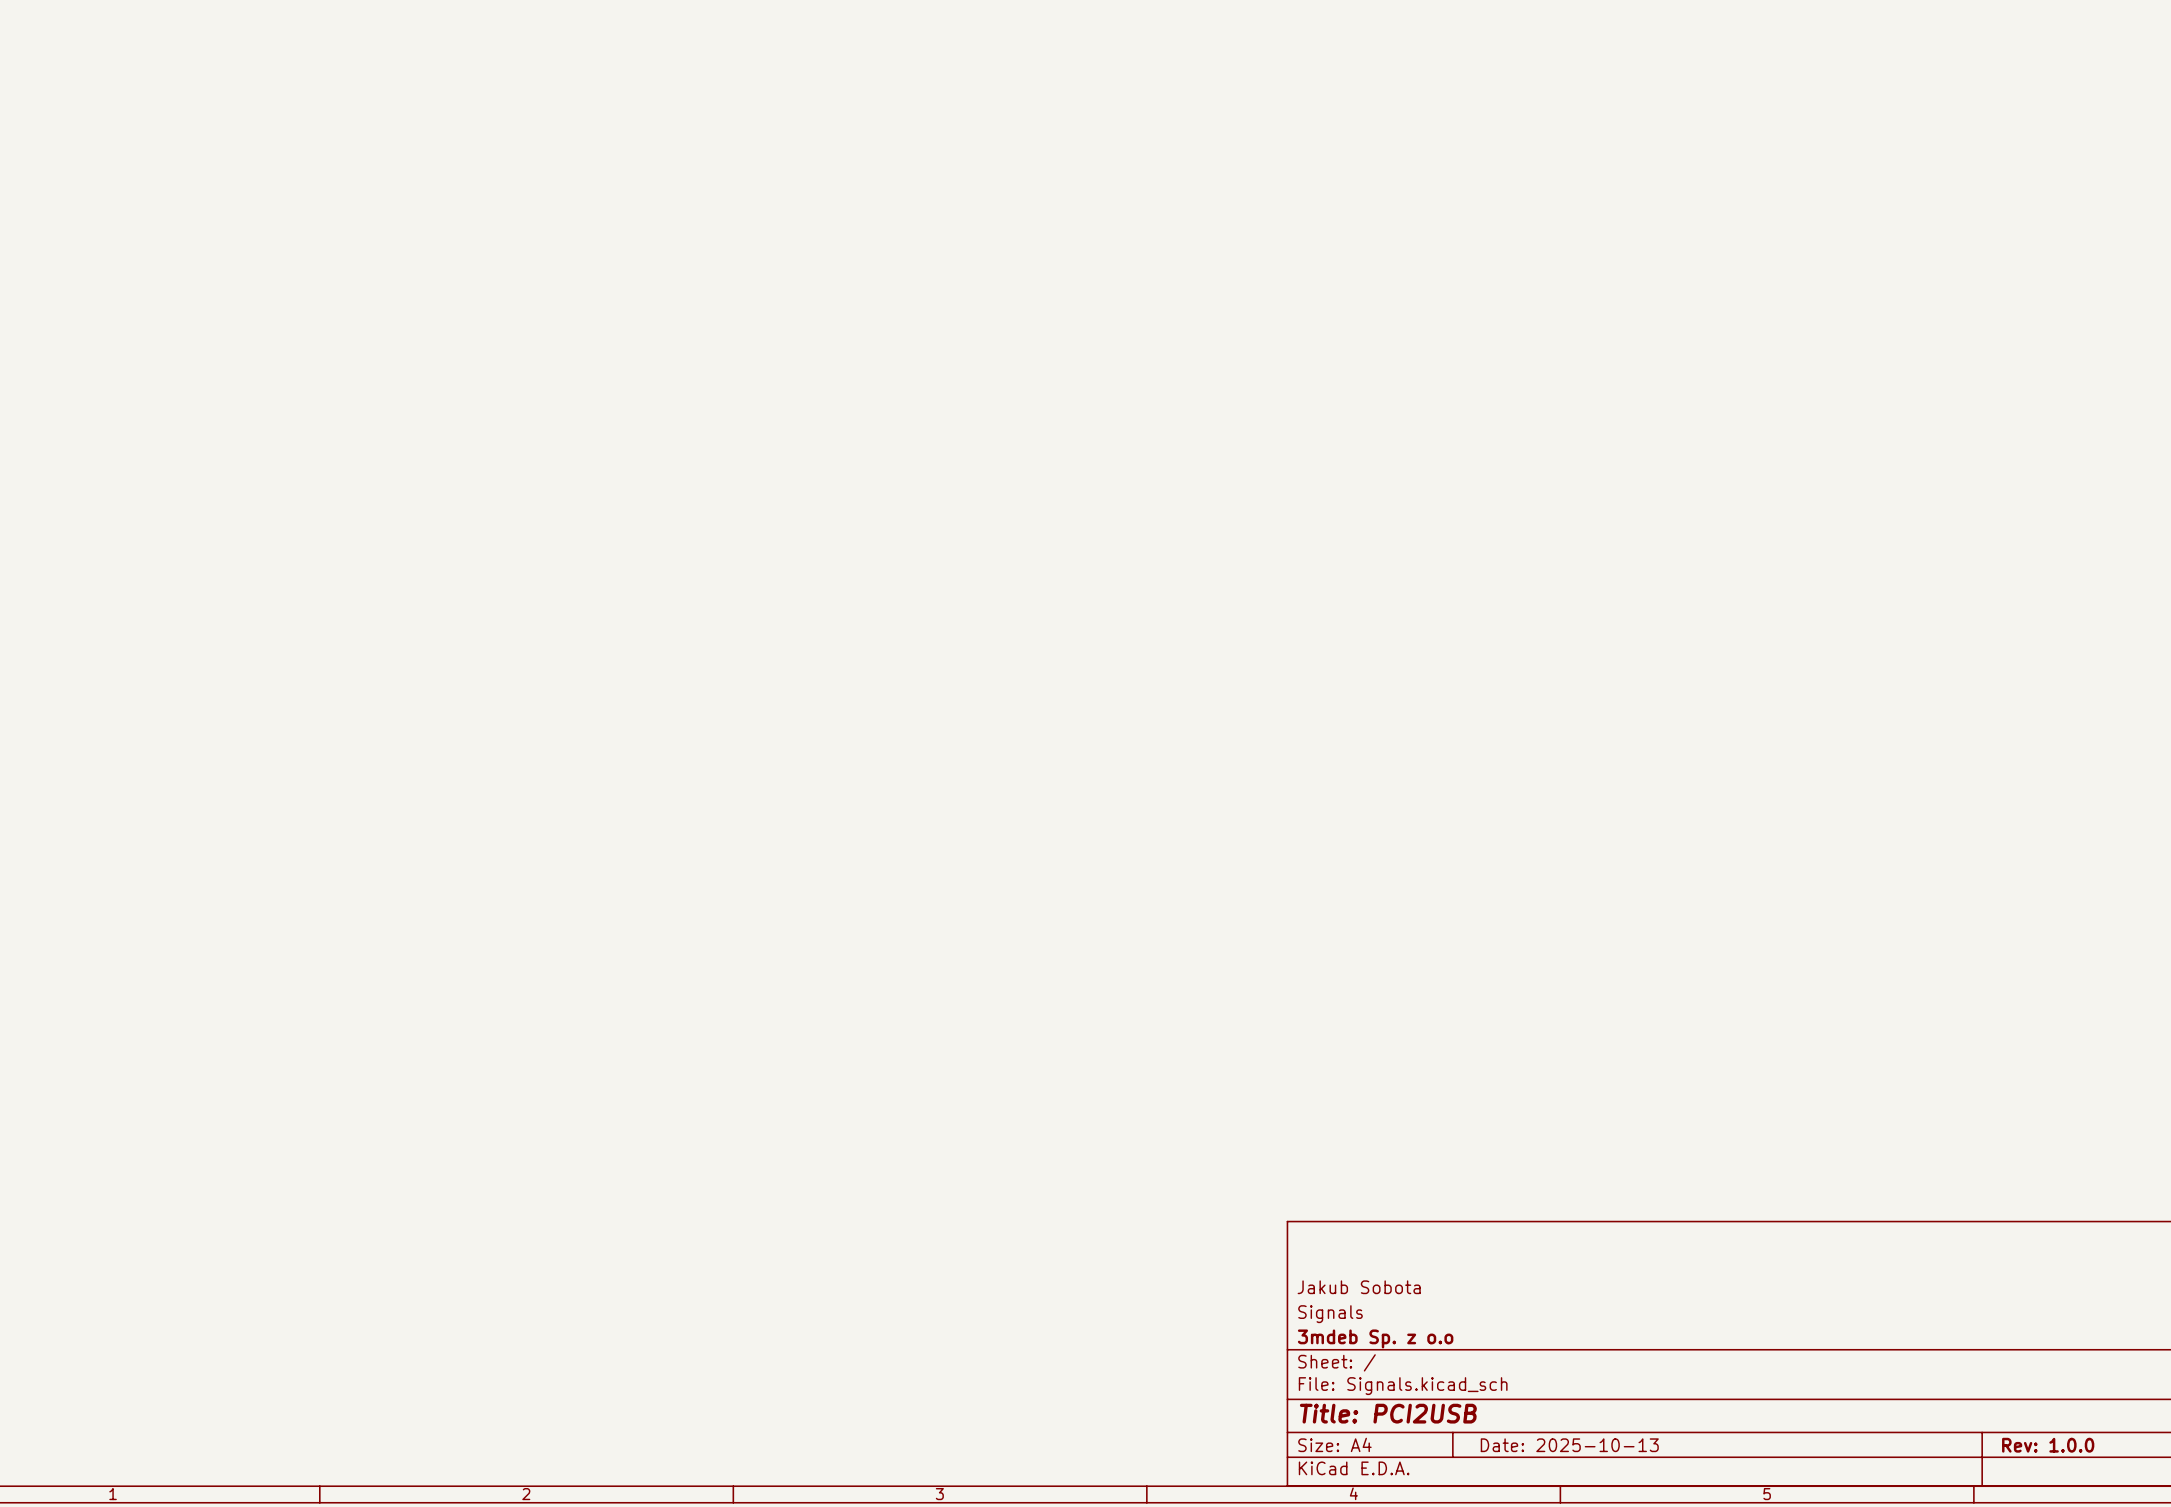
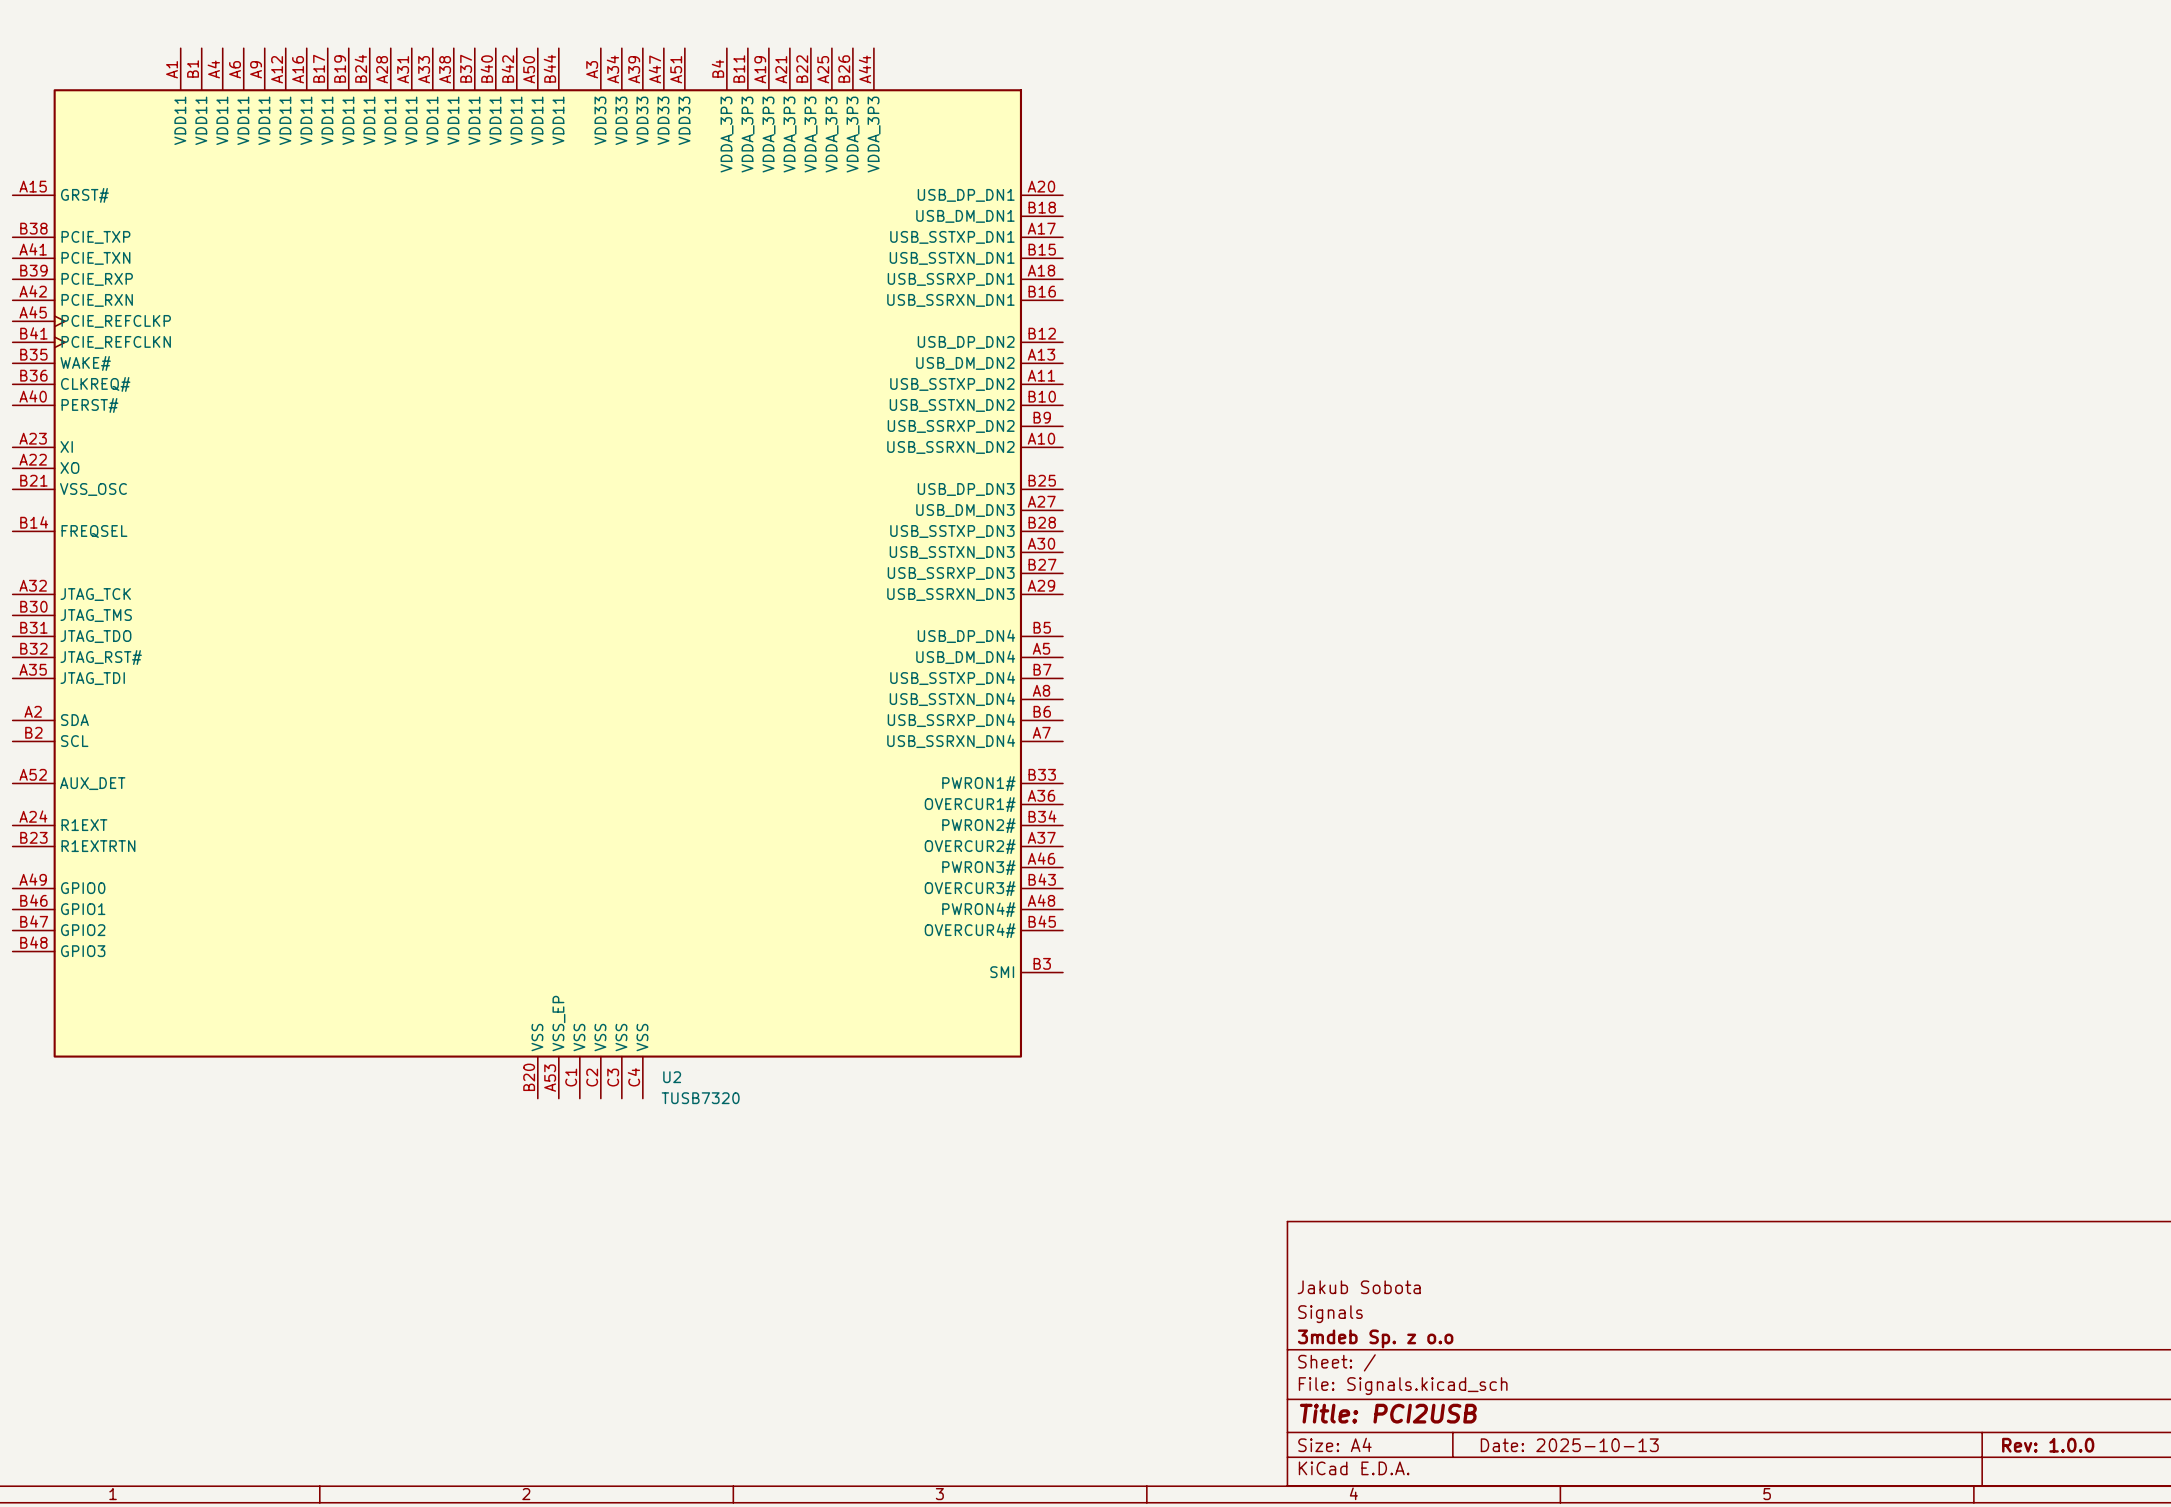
U2: none -> TUSB7320 (537, 573)

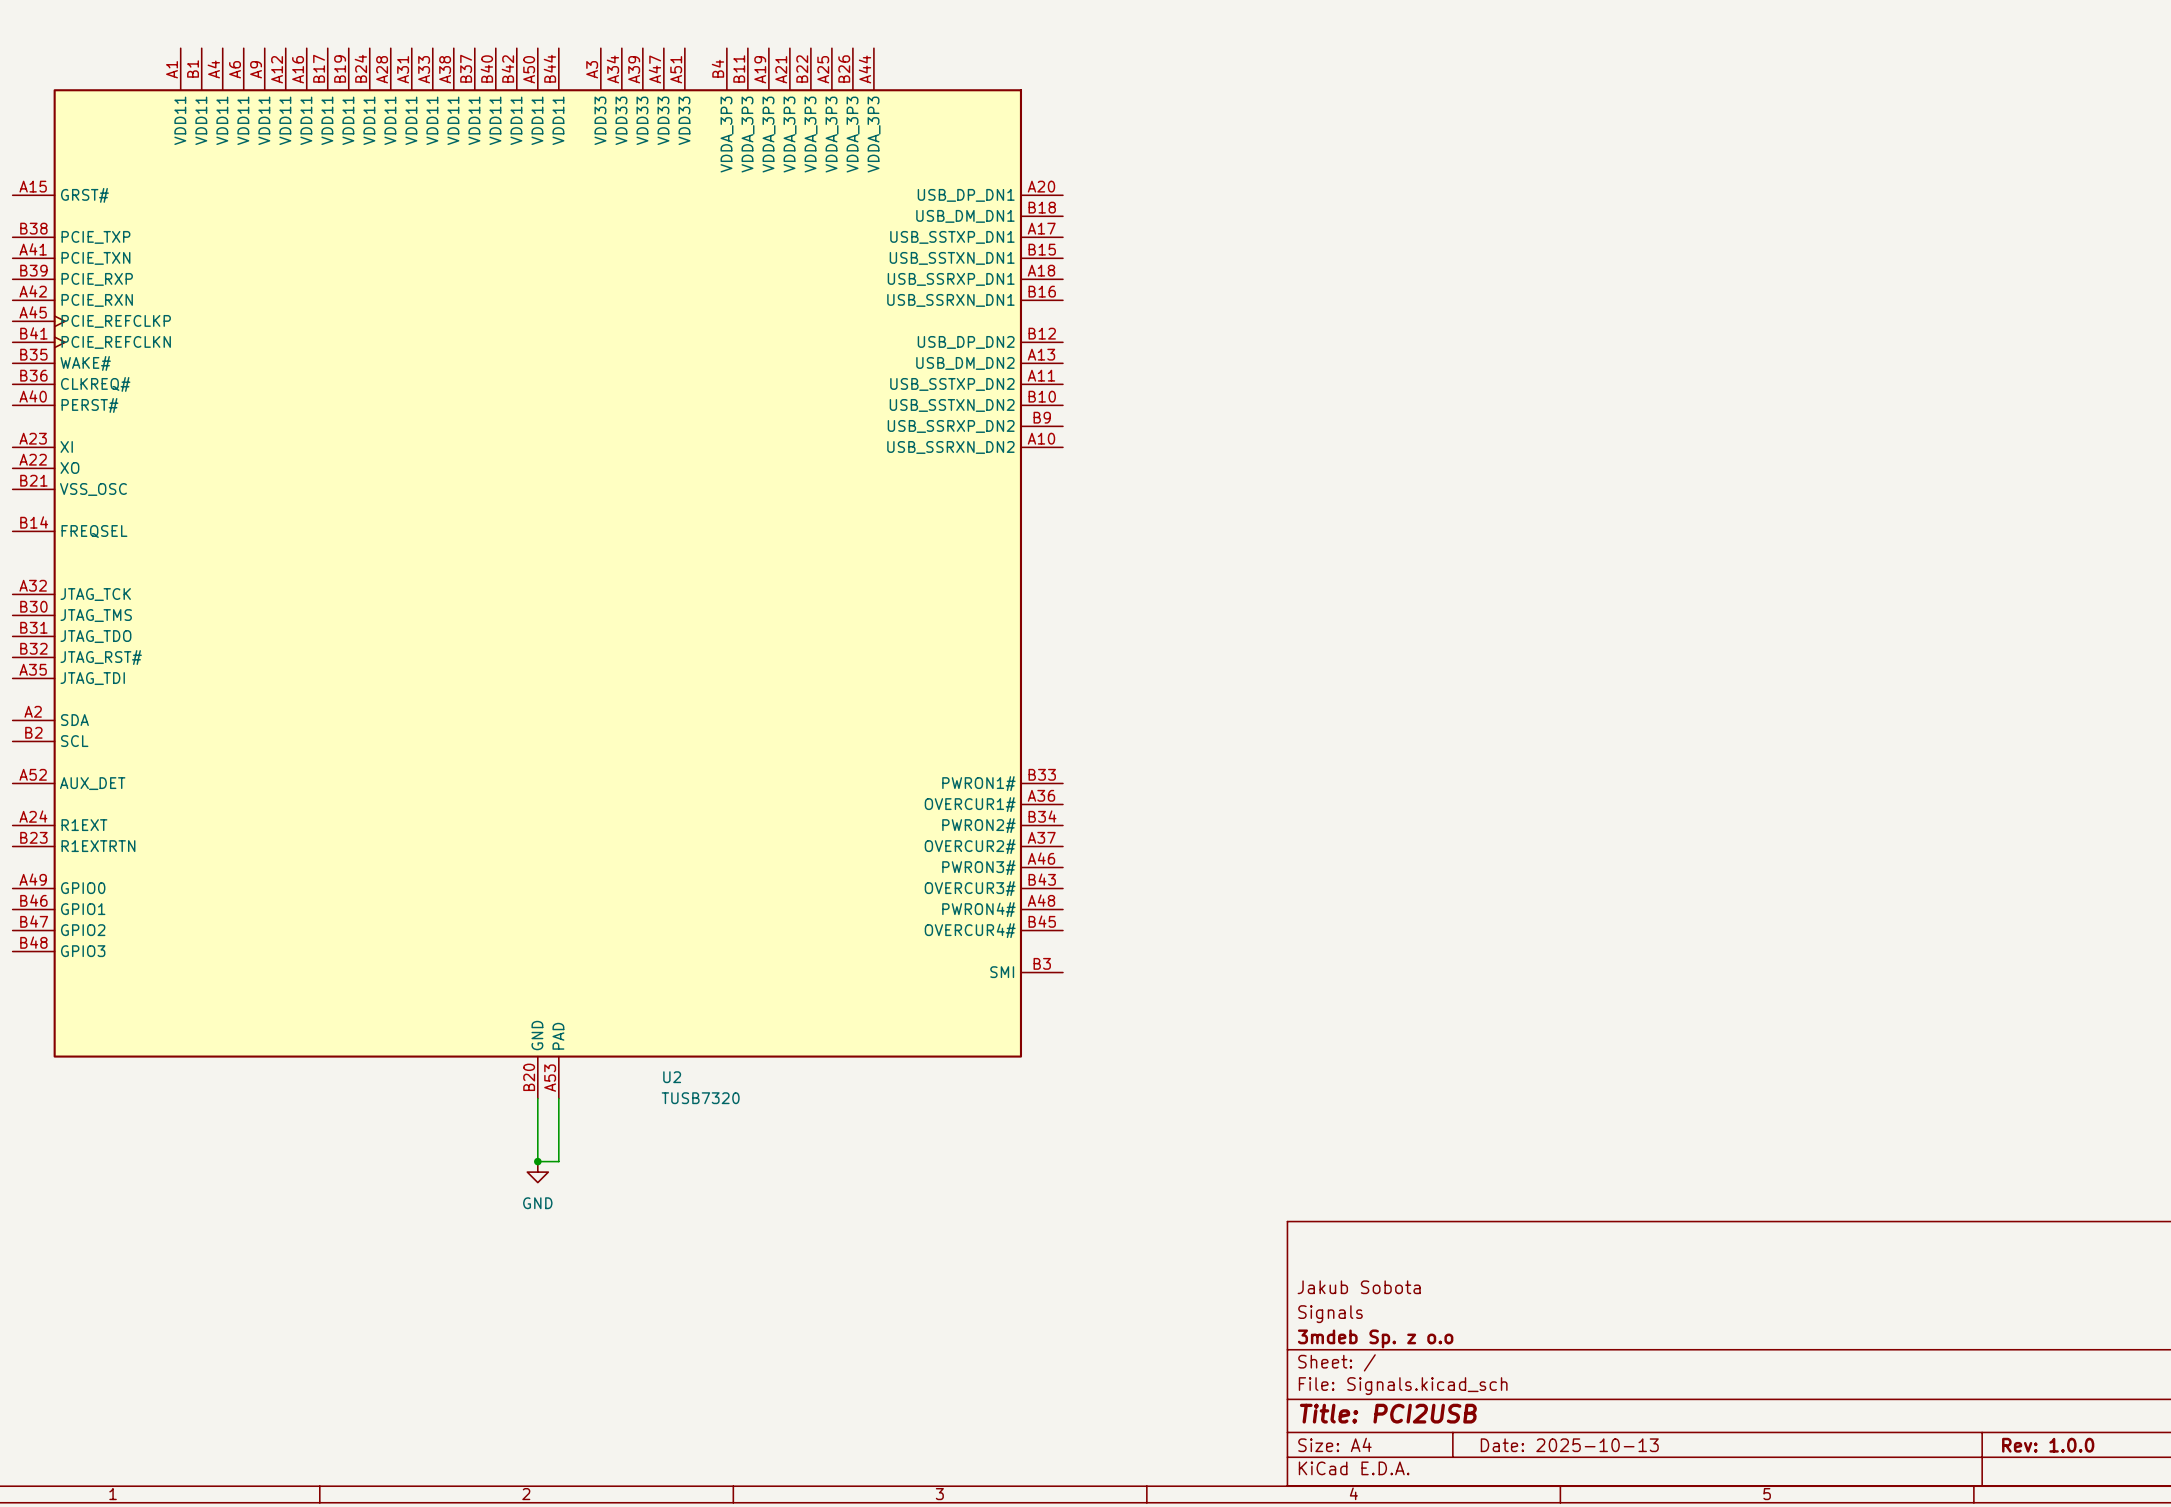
U2 symbol: [12, 48, 1063, 1099] -> [12, 48, 1063, 1099]
wire: none -> (537, 1098) (537, 1161) (558, 1161) (558, 1098)
junction: none -> (537, 1161)
power symbol: none -> GND (537, 1172)

